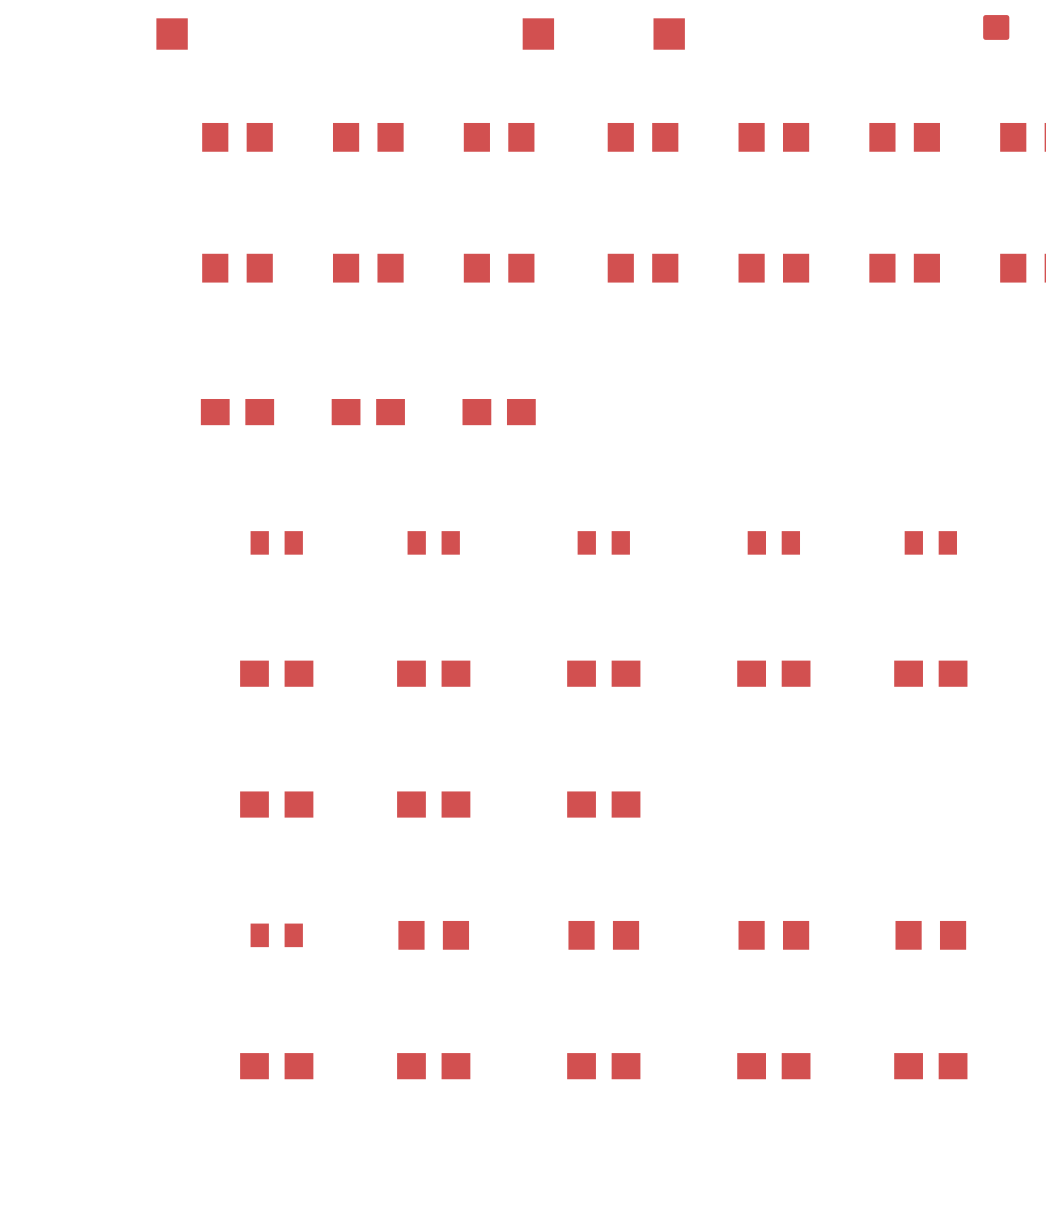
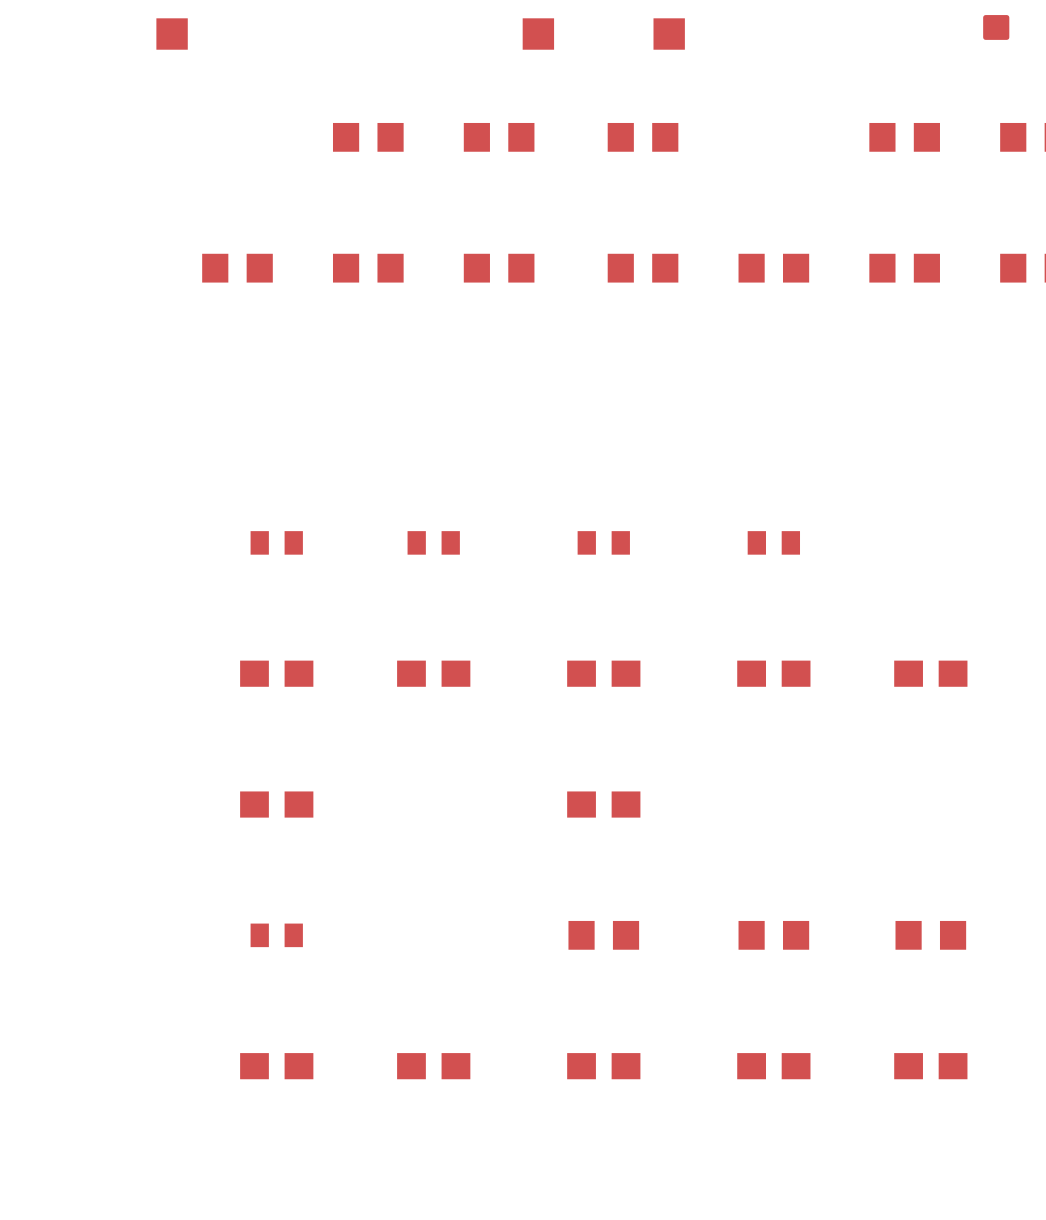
part: (237, 137) -> none
part: (773, 137) -> none
part: (237, 412) -> none
part: (368, 412) -> none
part: (499, 412) -> none
part: (930, 542) -> none
part: (433, 804) -> none
part: (433, 935) -> none

